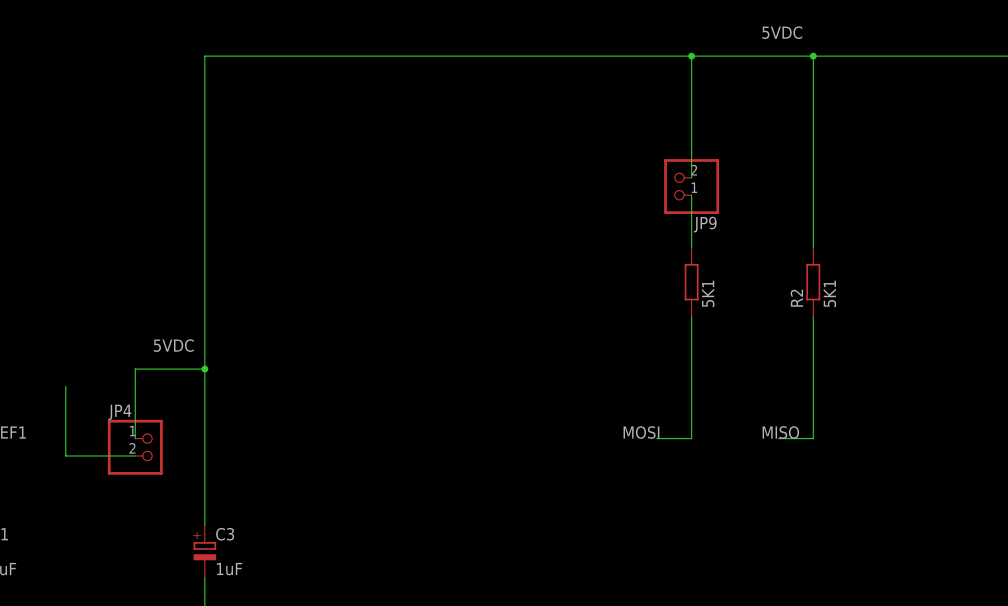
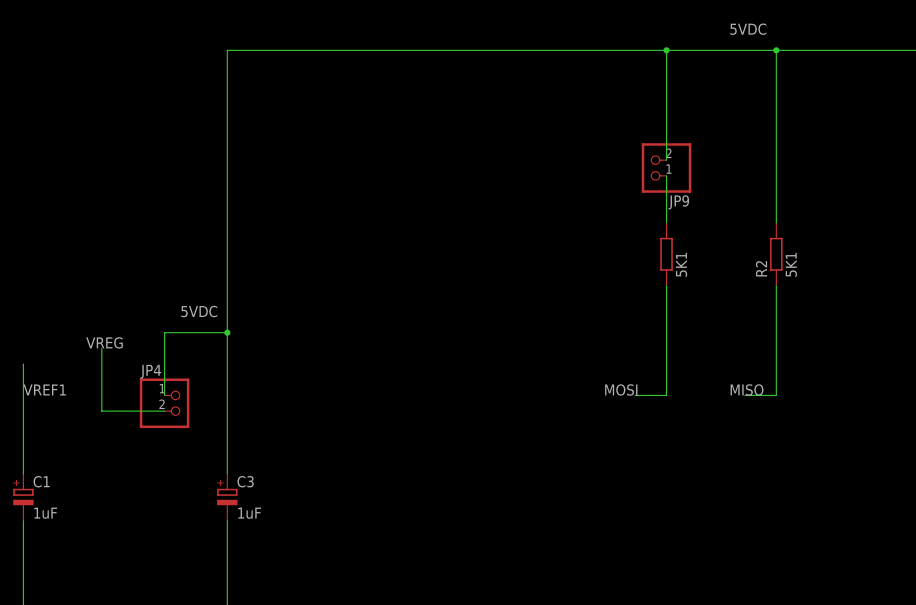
label: none -> VREG (104, 342)

